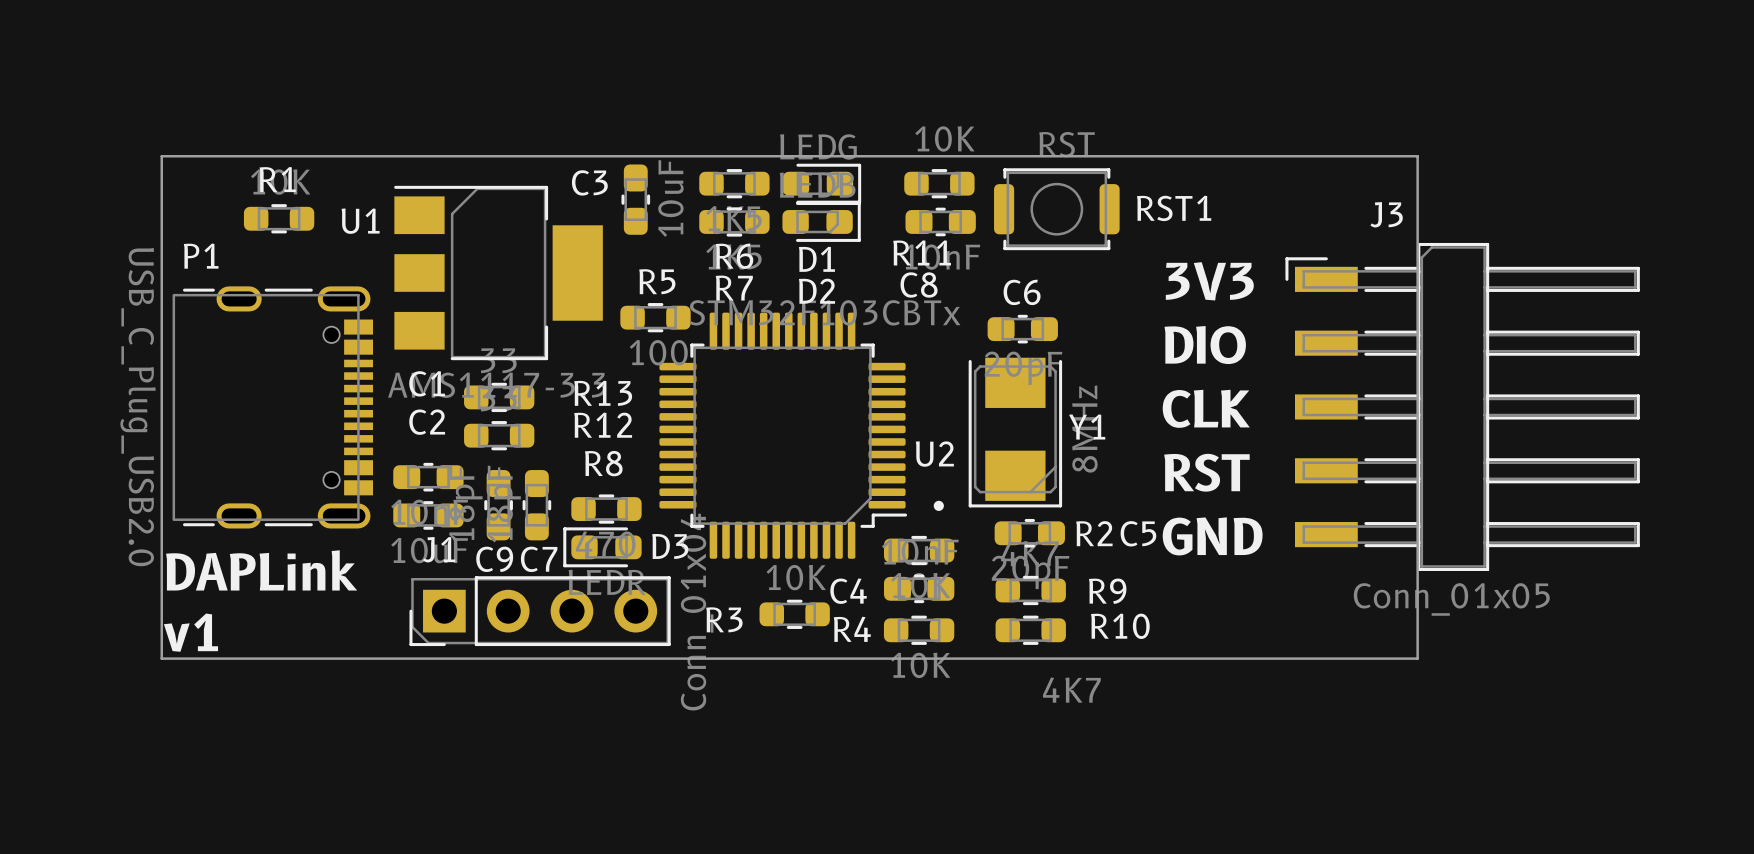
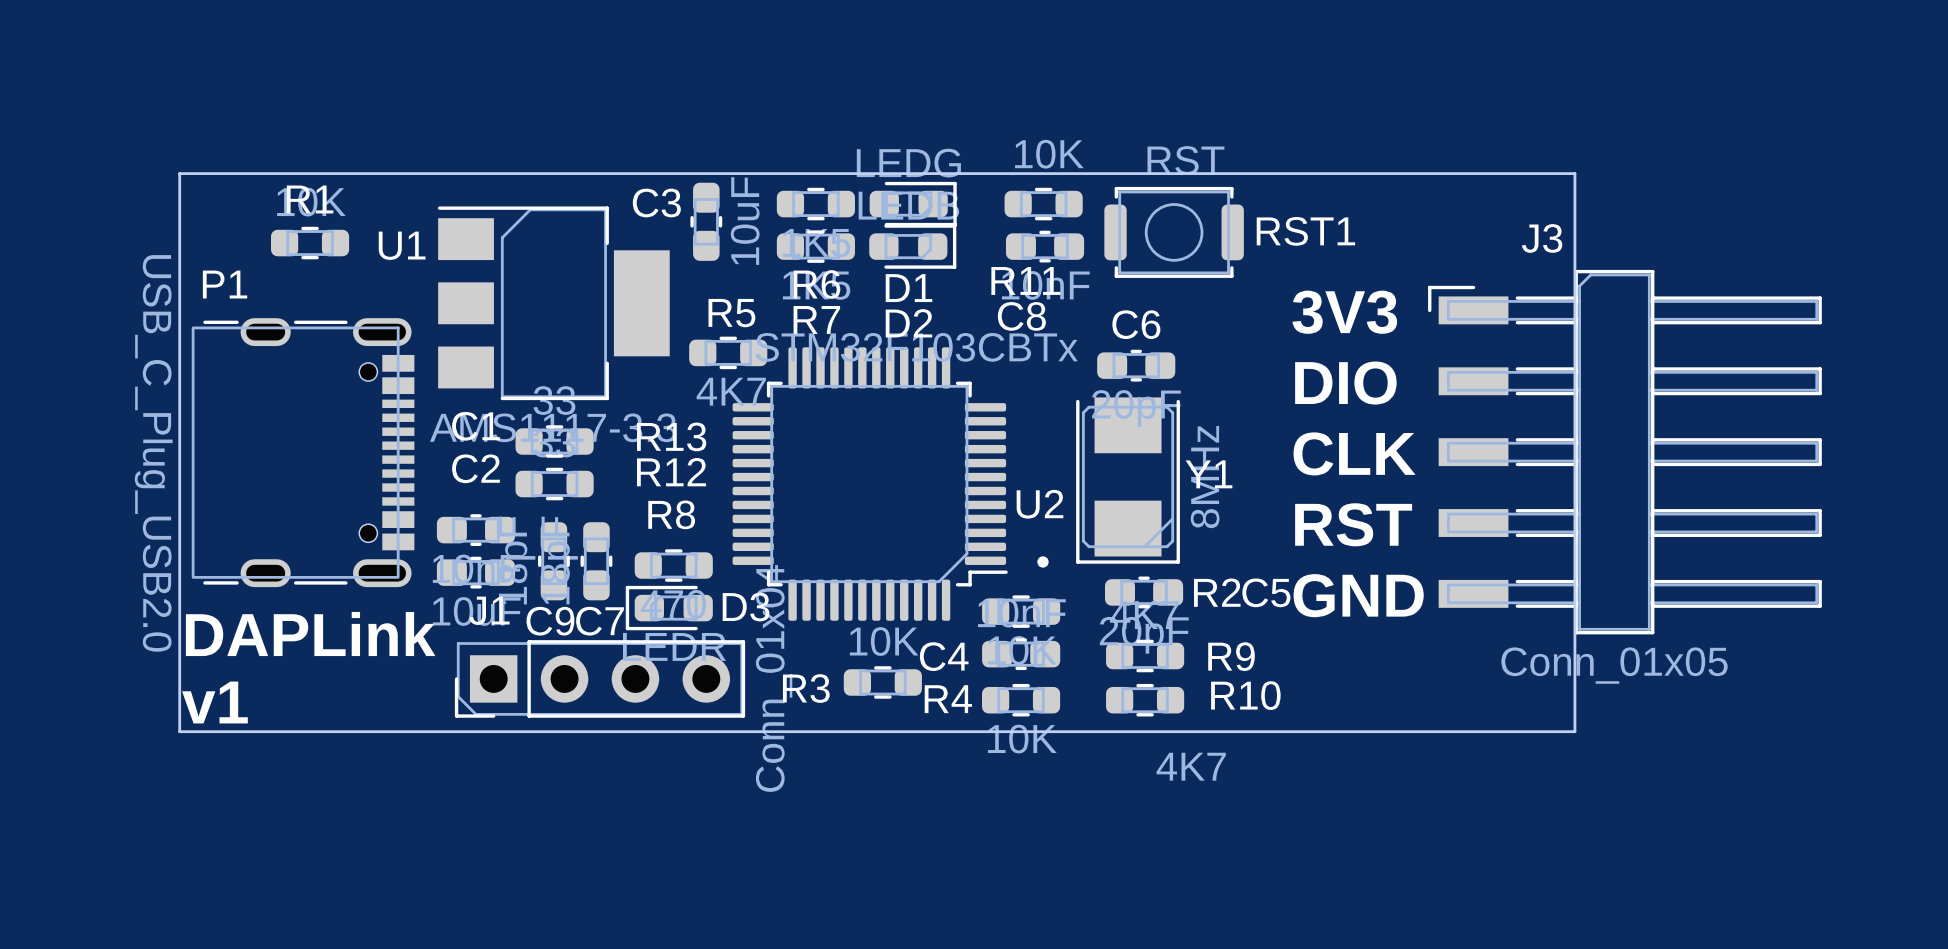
R5 value: 100 (658, 352) -> 4K7 (731, 391)

